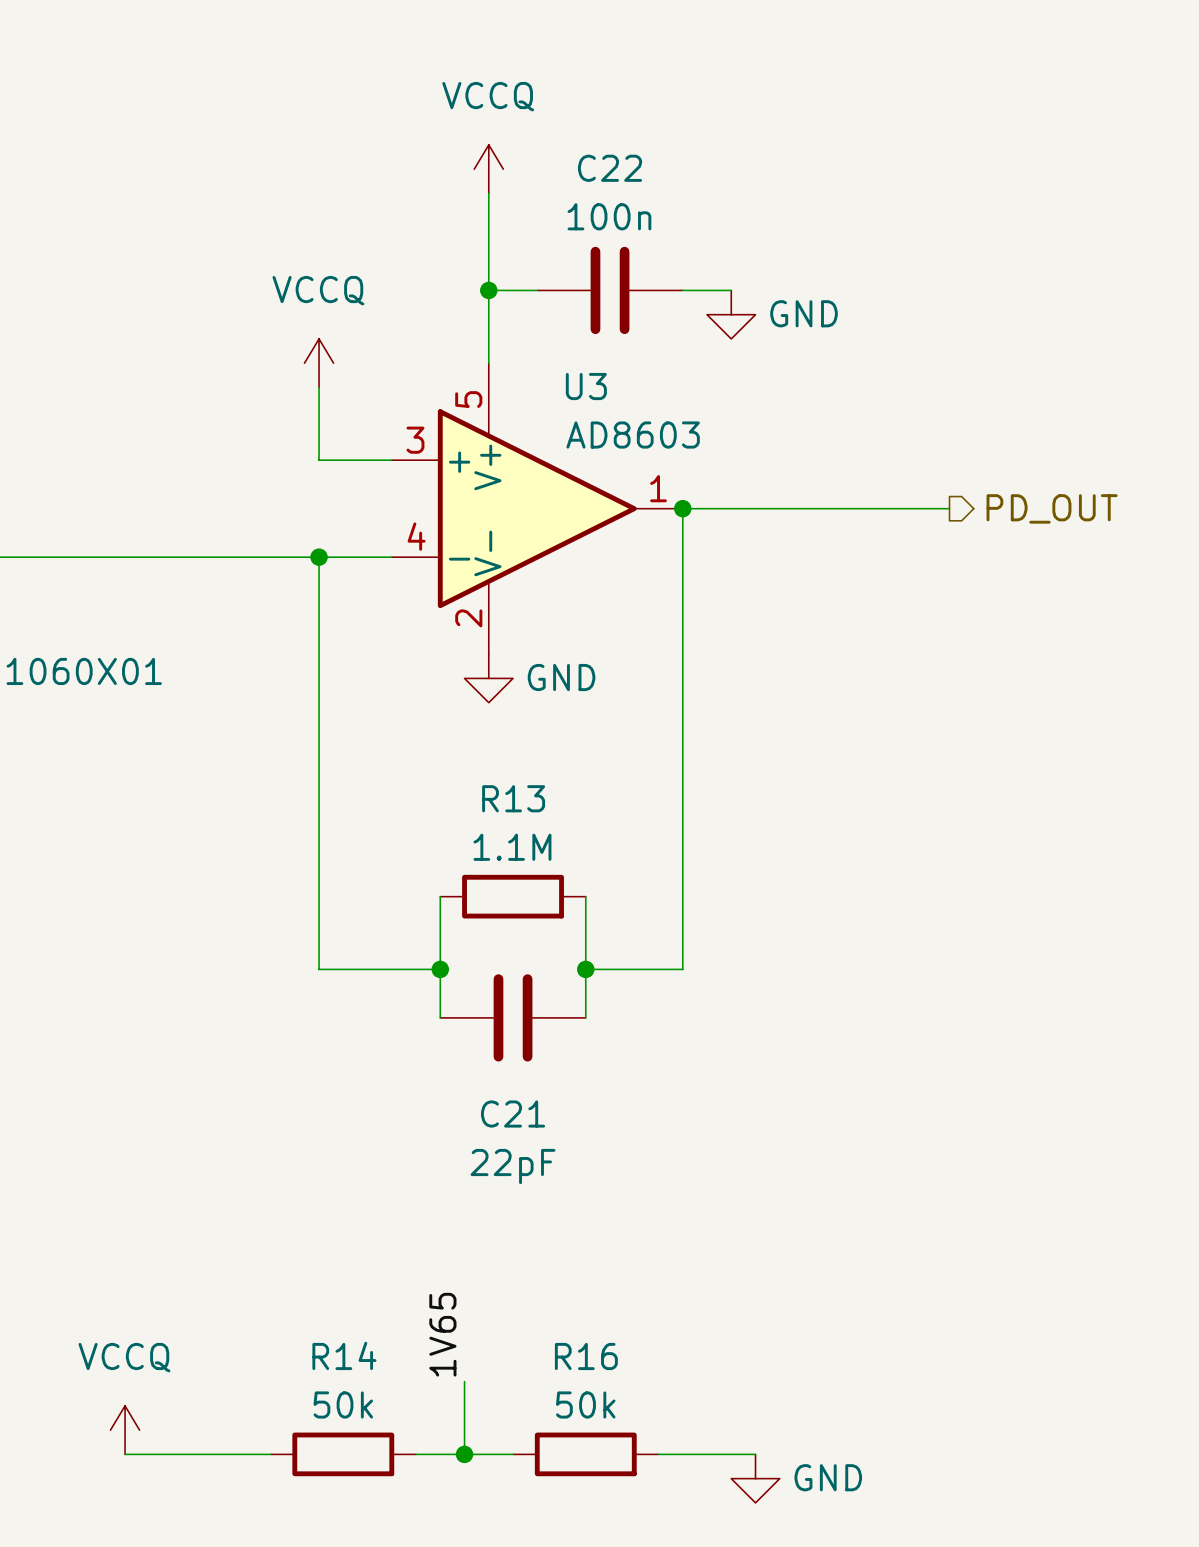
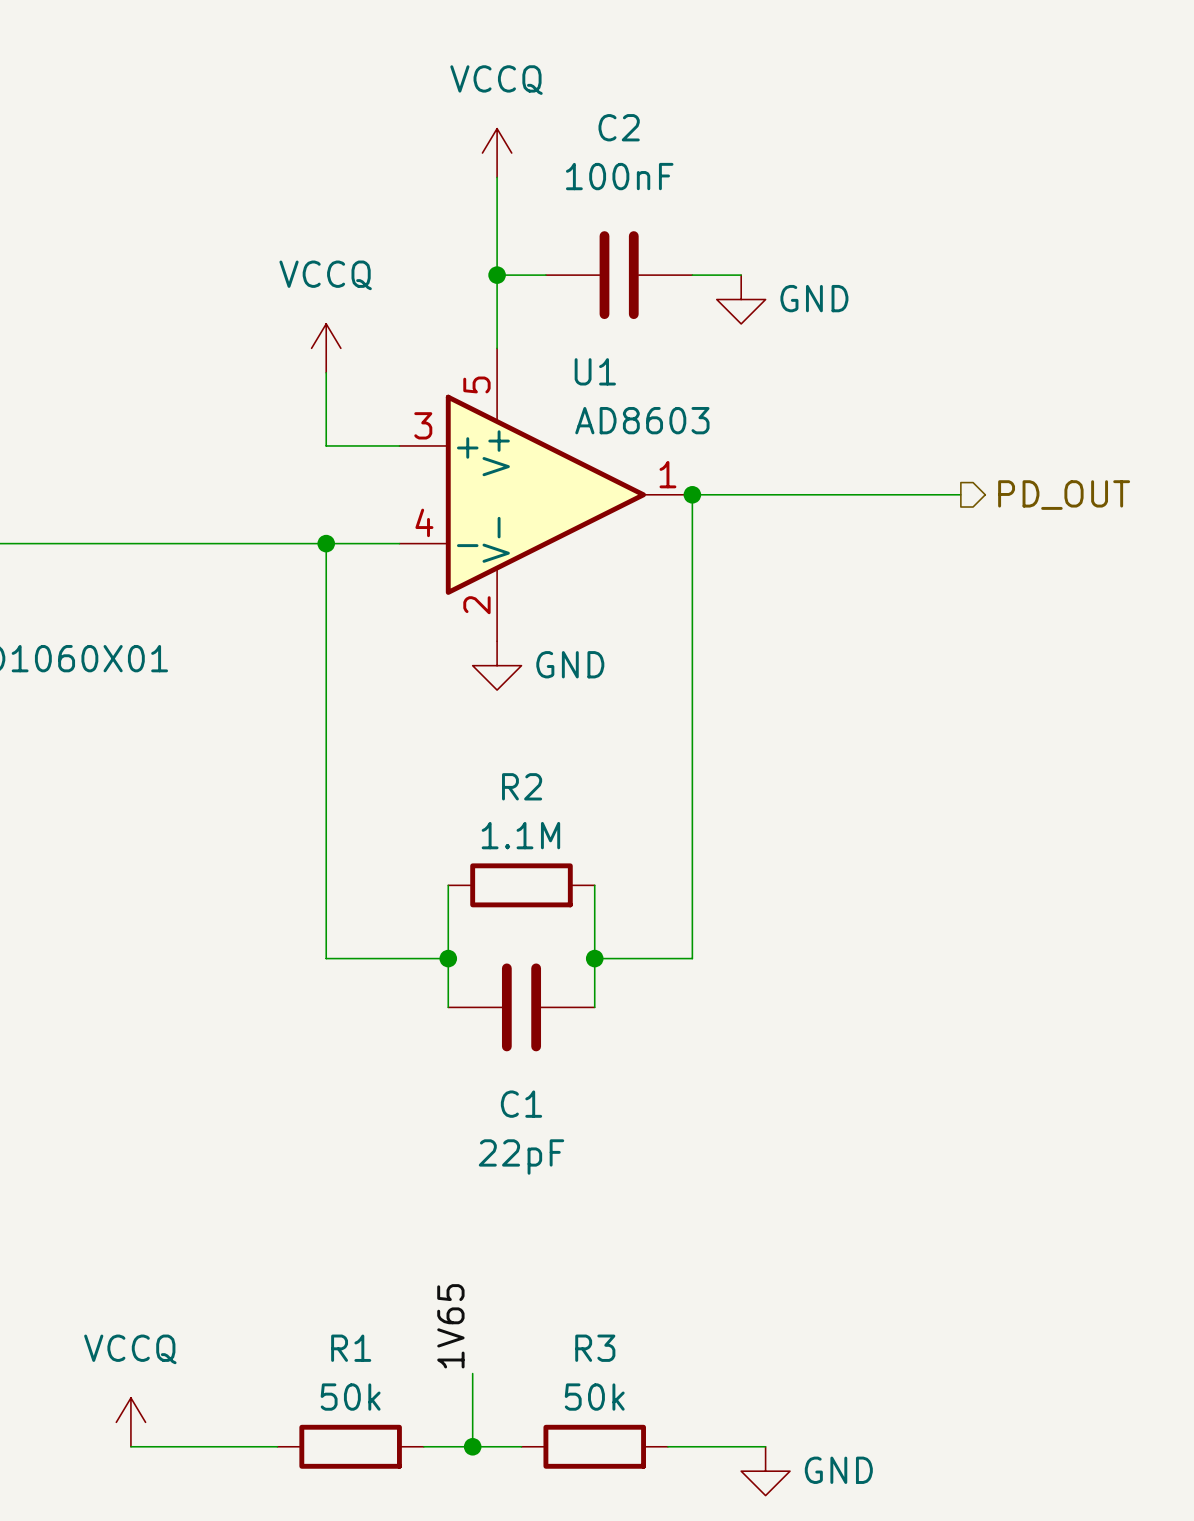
C22 name: C22 (610, 168) -> C2 (619, 127)
C22 value: 100n (609, 216) -> 100nF (619, 176)
U3 name: U3 (586, 386) -> U1 (595, 371)
R13 name: R13 (513, 798) -> R2 (522, 786)
C21 name: C21 (513, 1114) -> C1 (521, 1104)
R14 name: R14 (344, 1355) -> R1 (351, 1348)
R16 name: R16 (586, 1356) -> R3 (595, 1348)

